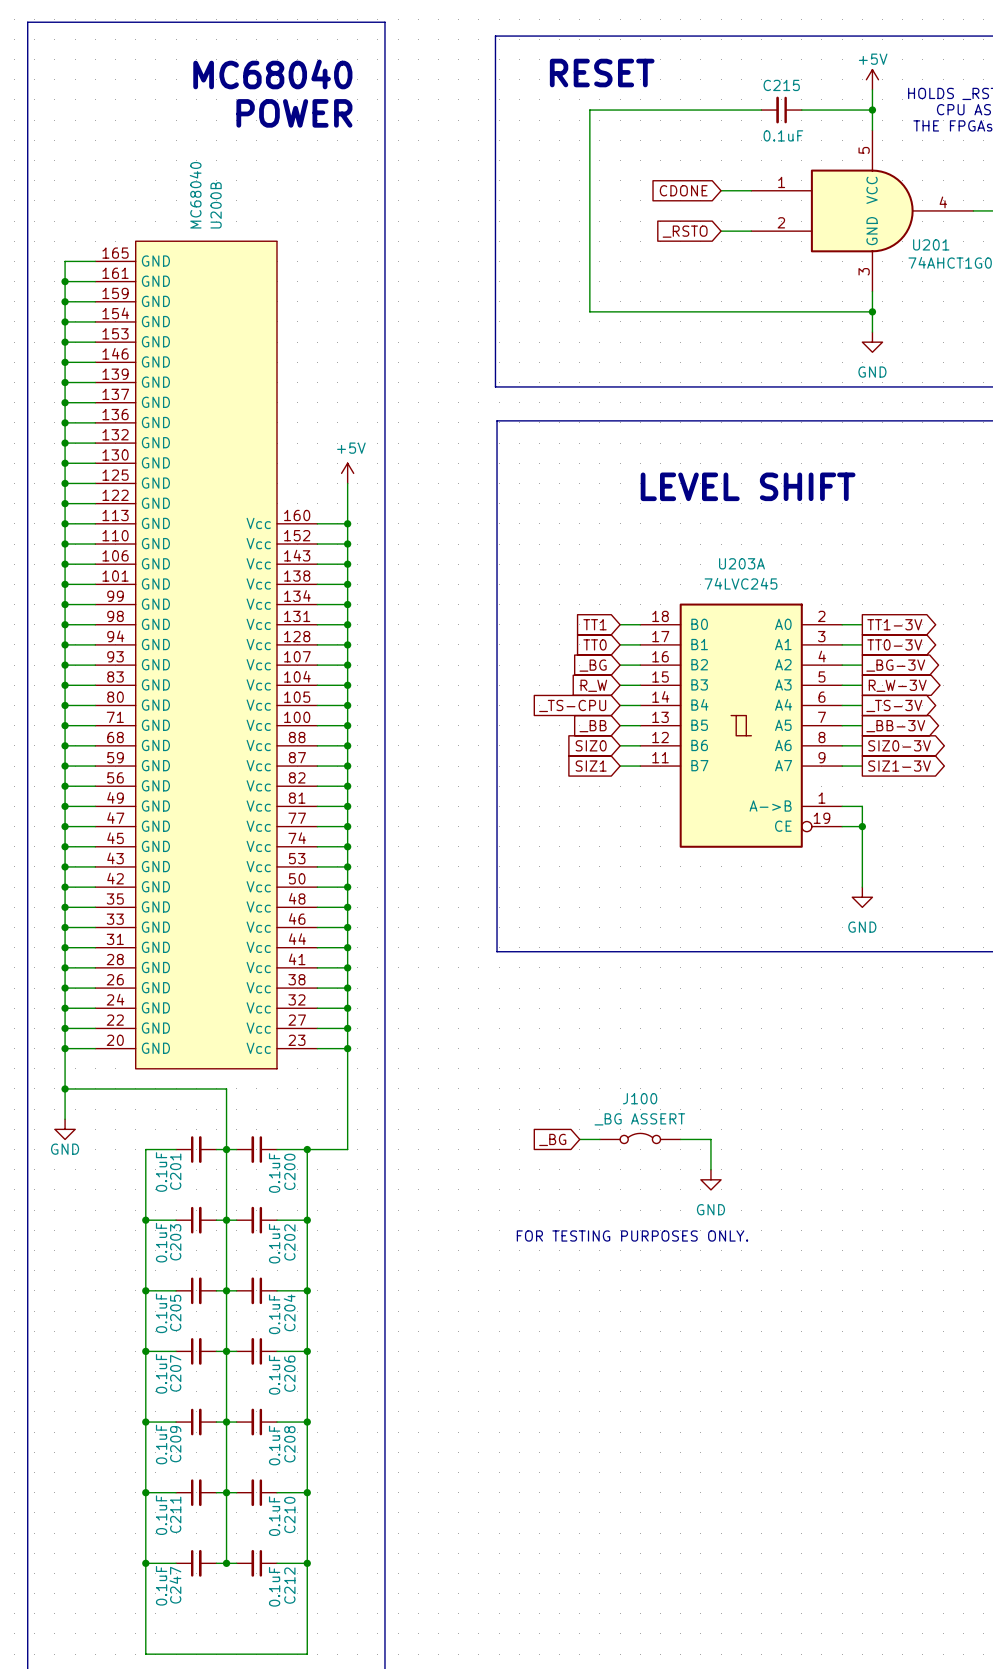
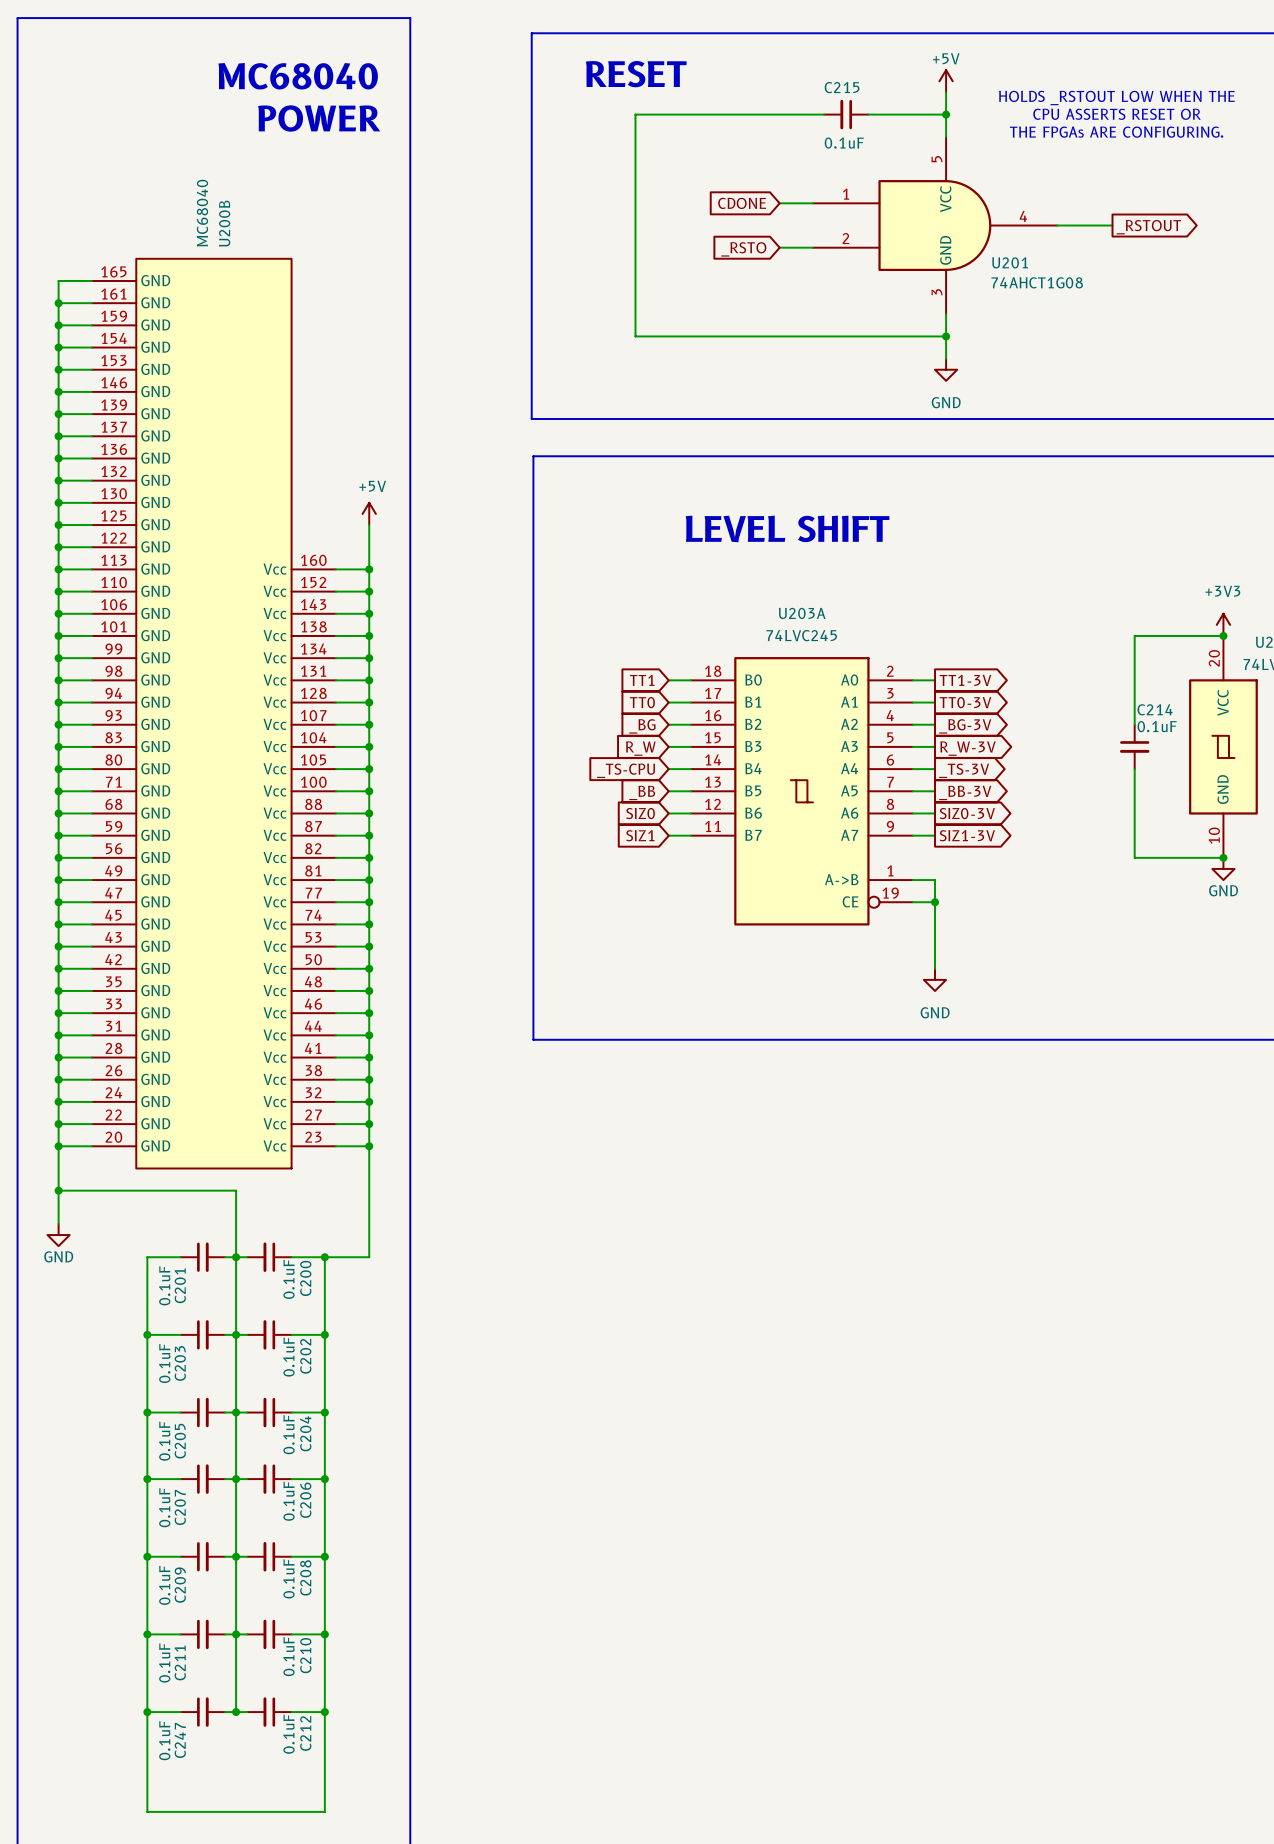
J100: _BG ASSERT (640, 1138) -> none
global label: _BG (552, 1139) -> none
wire: (579, 1139) (599, 1139) -> none
wire: (680, 1139) (710, 1139) (710, 1169) -> none
power symbol: GND (710, 1179) -> none
text: FOR TESTING PURPOSES ONLY. (632, 1235) -> none

